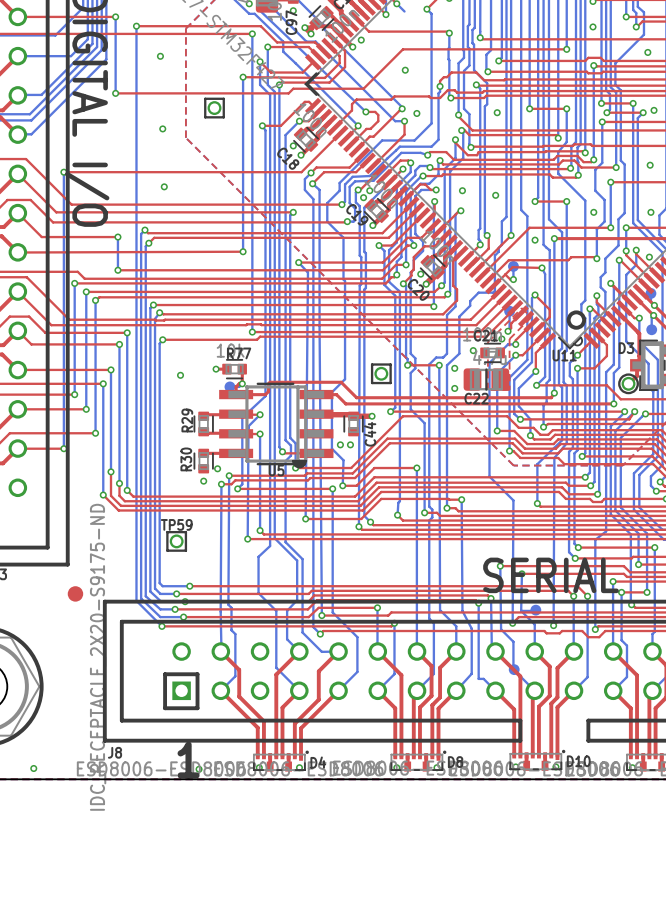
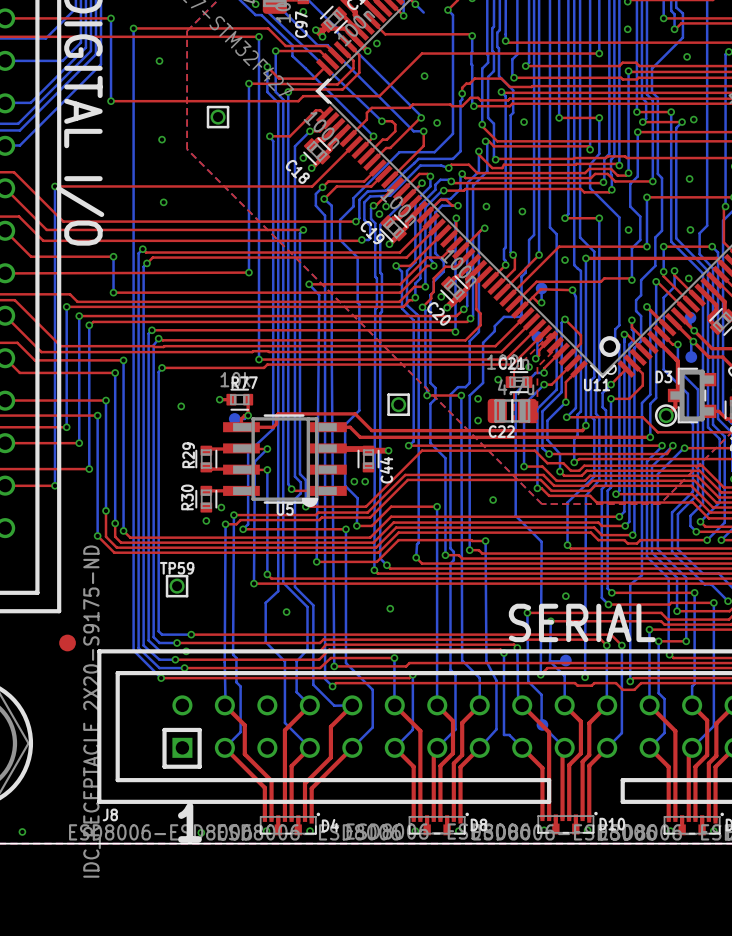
via: none -> (493, 500)
via: none -> (565, 596)
via: none -> (390, 608)
via: none -> (286, 612)

